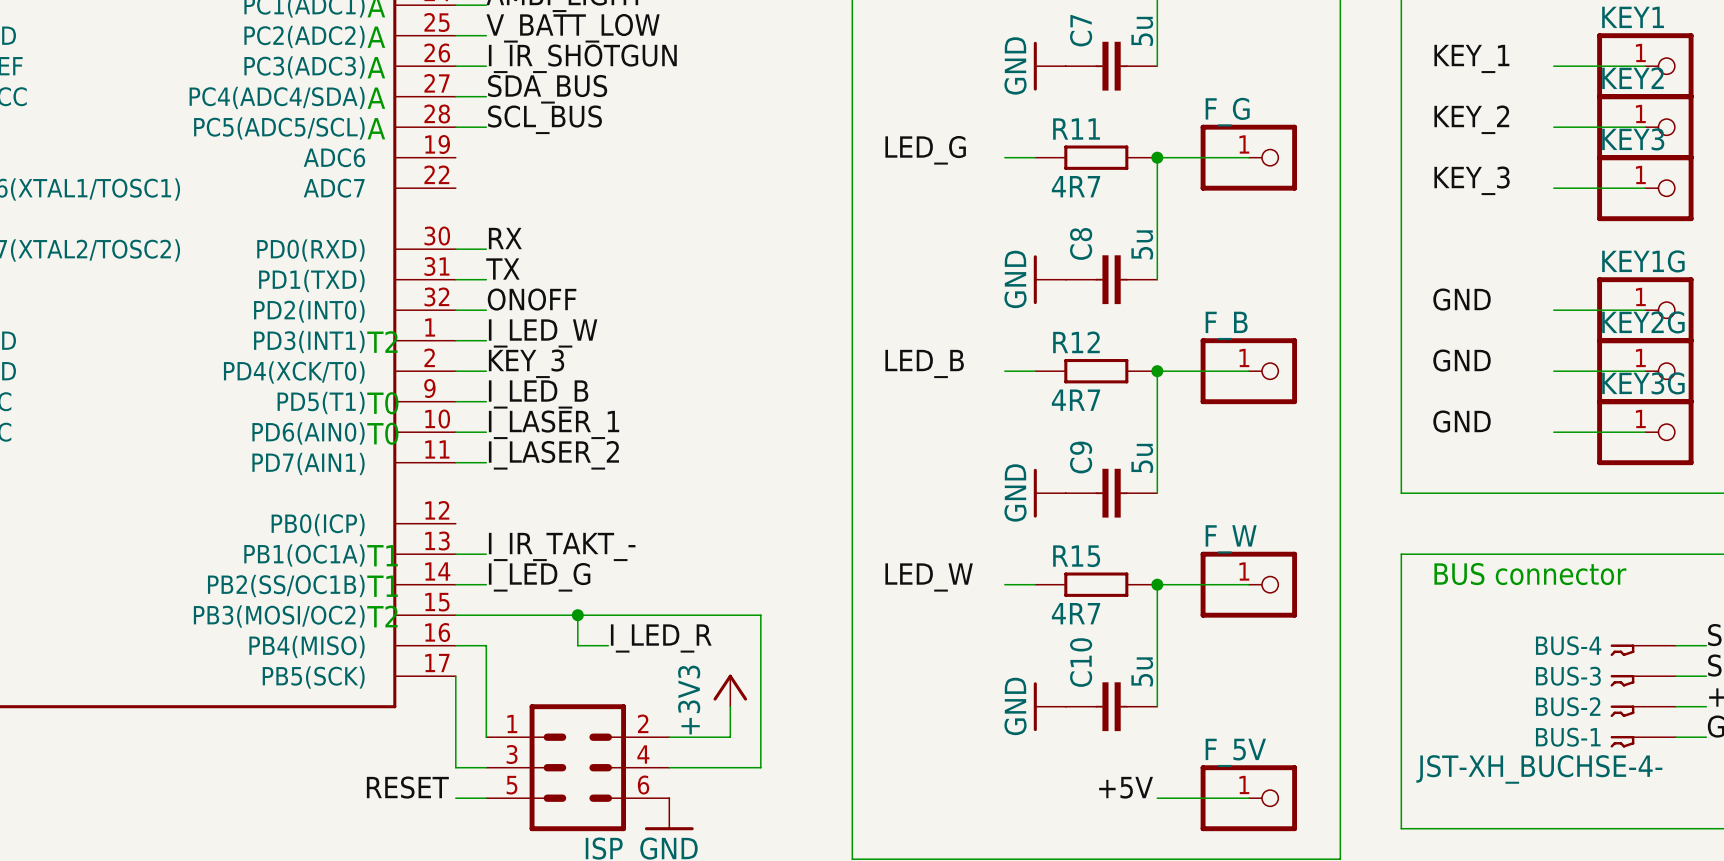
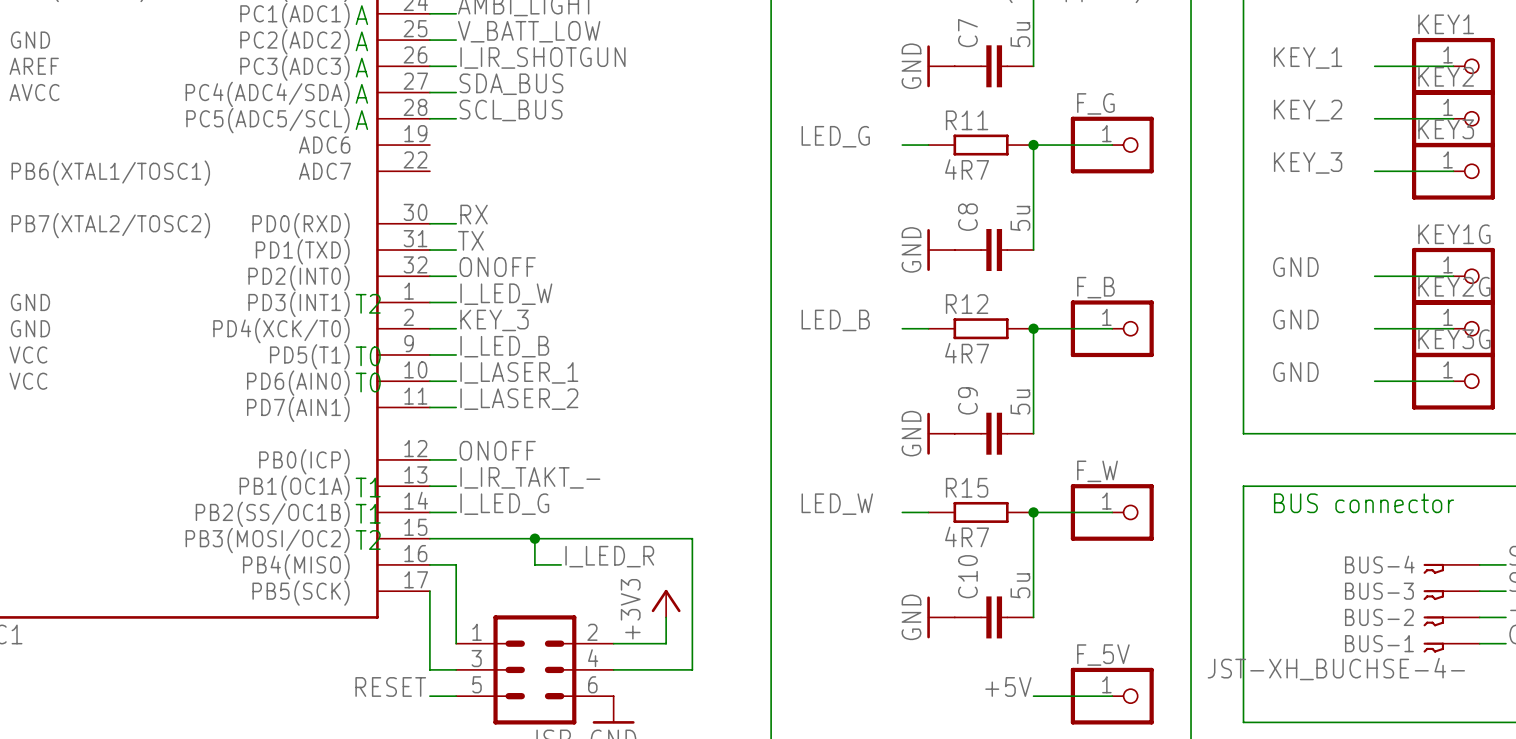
label: none -> ONOFF (497, 450)
wire: none -> (429, 459) (456, 459)

